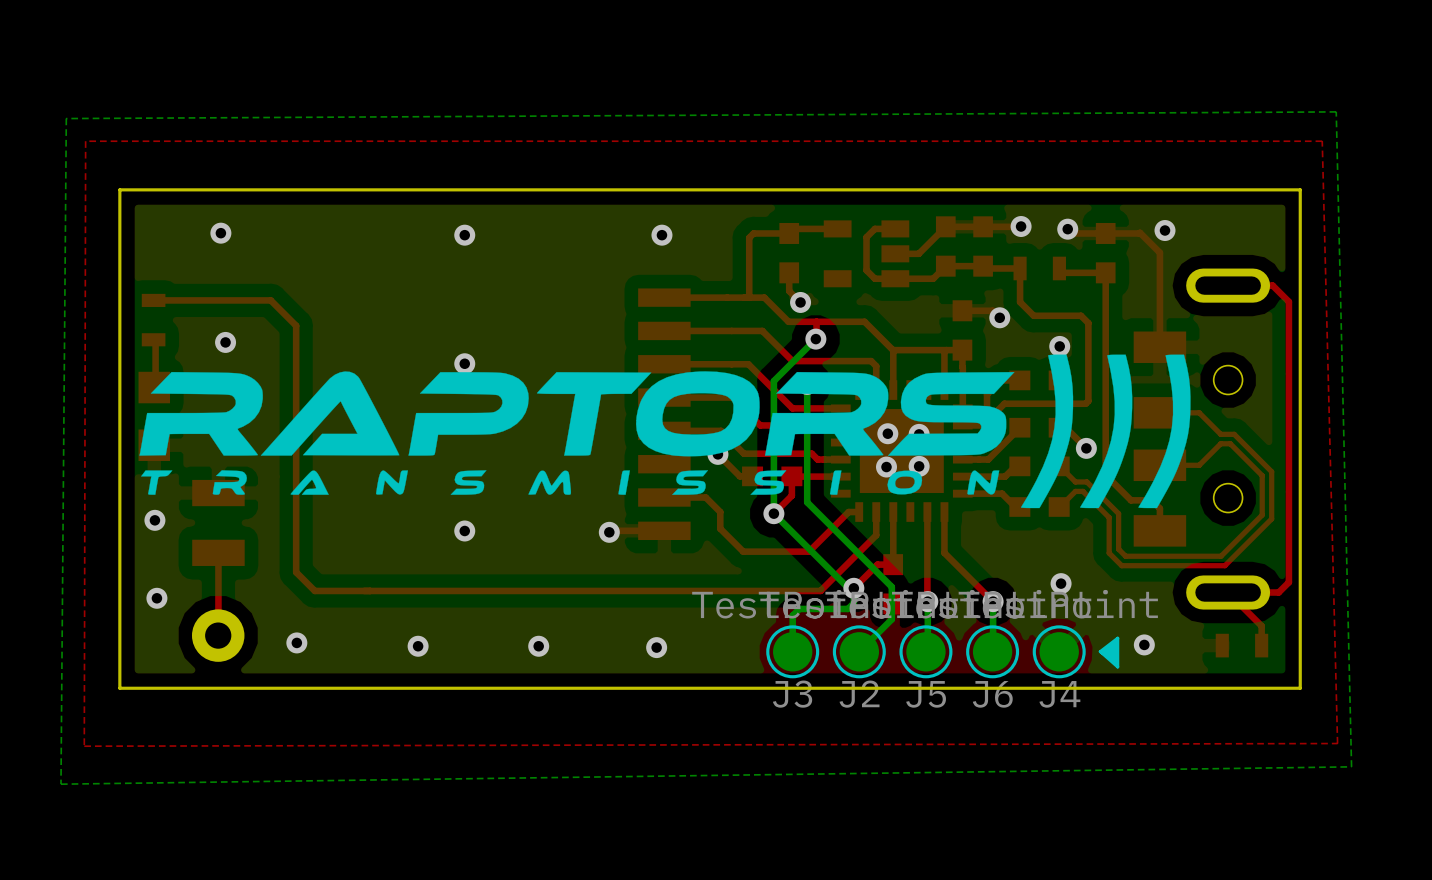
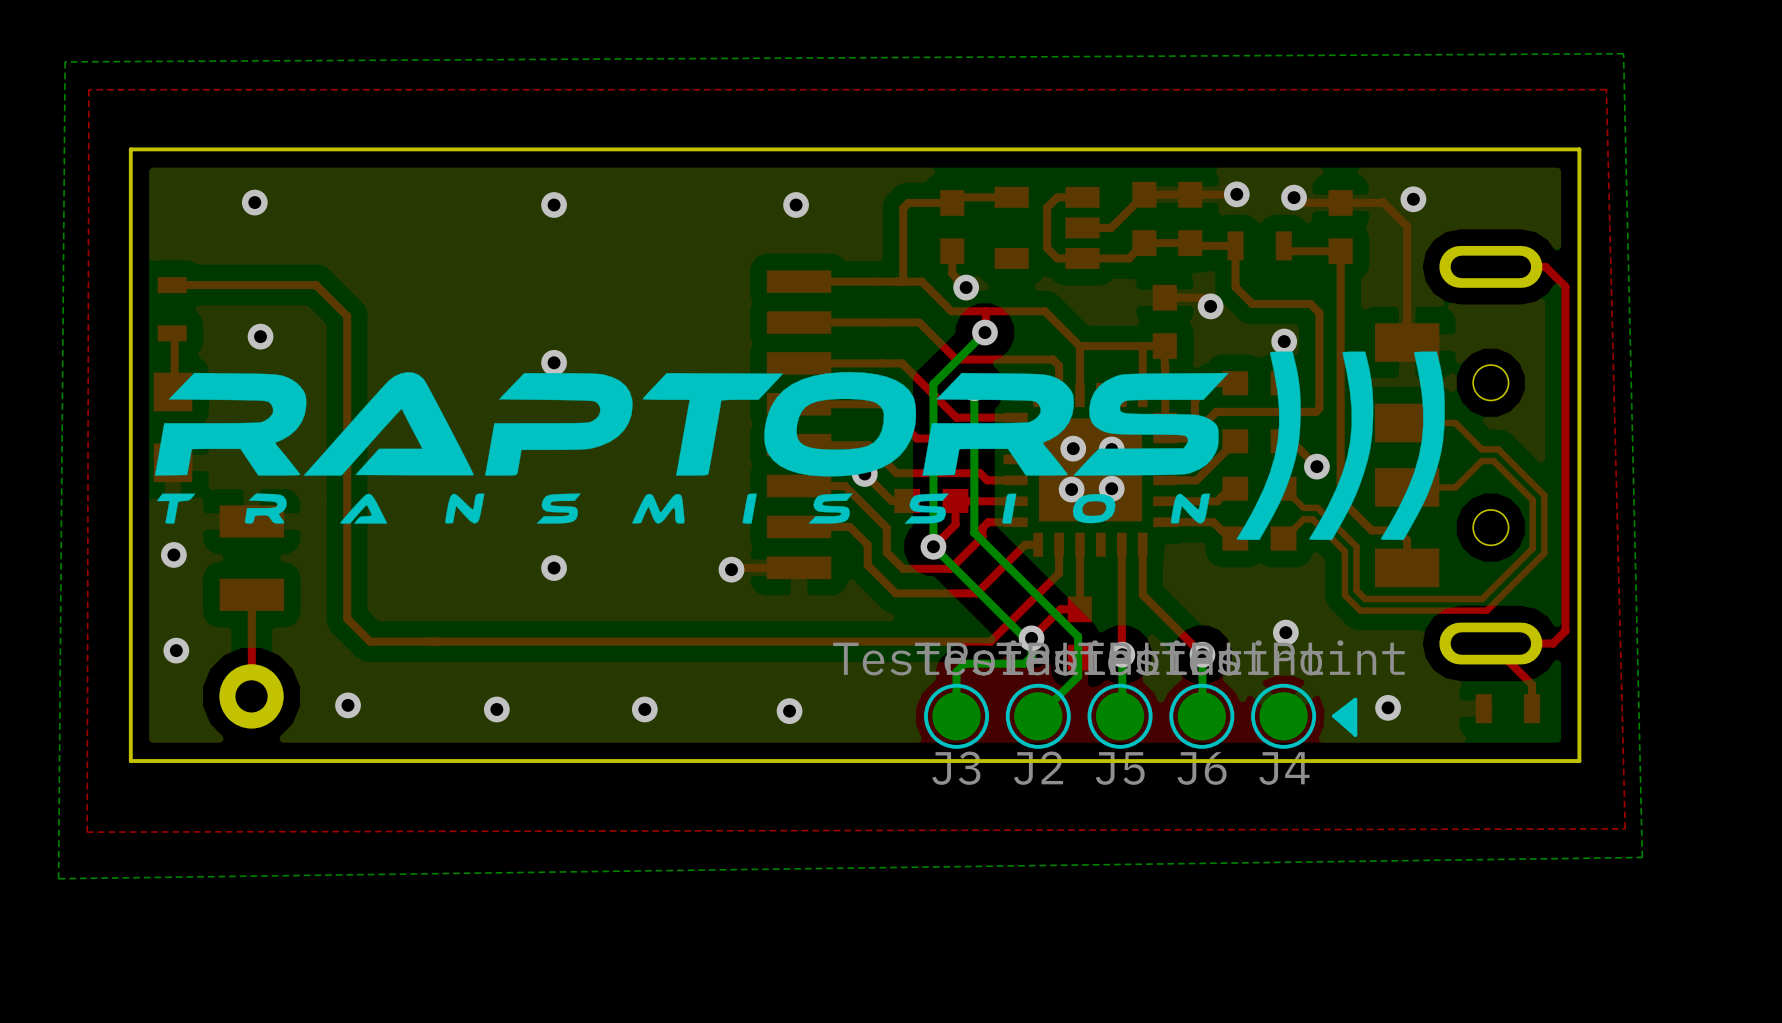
top track: none -> (799, 486) (844, 486) (886, 527) (886, 552) (903, 568) (950, 568) (982, 536) (982, 527) (988, 522) (1015, 522)

